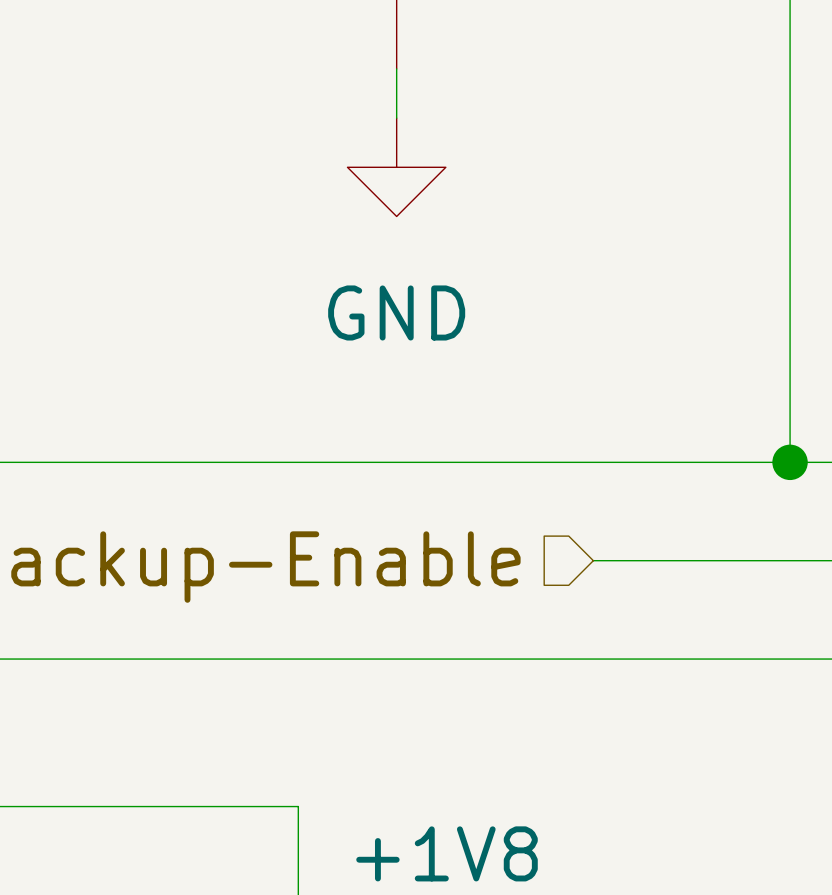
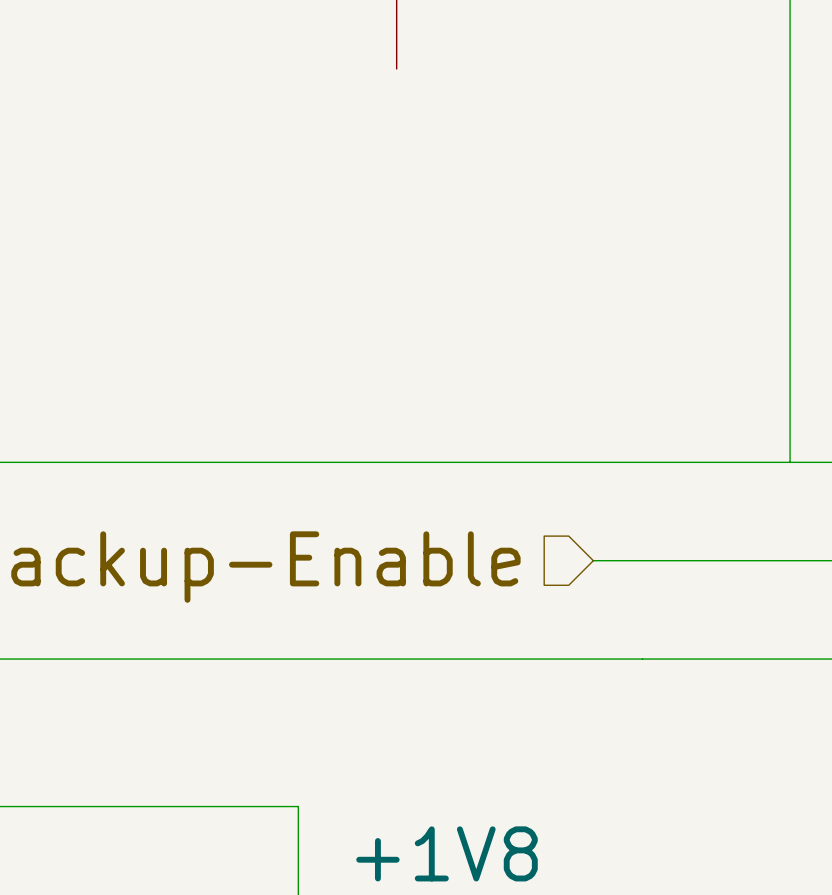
wire: (396, 68) (396, 118) -> none
power symbol: GND (396, 167) -> none
junction: (790, 462) -> none

